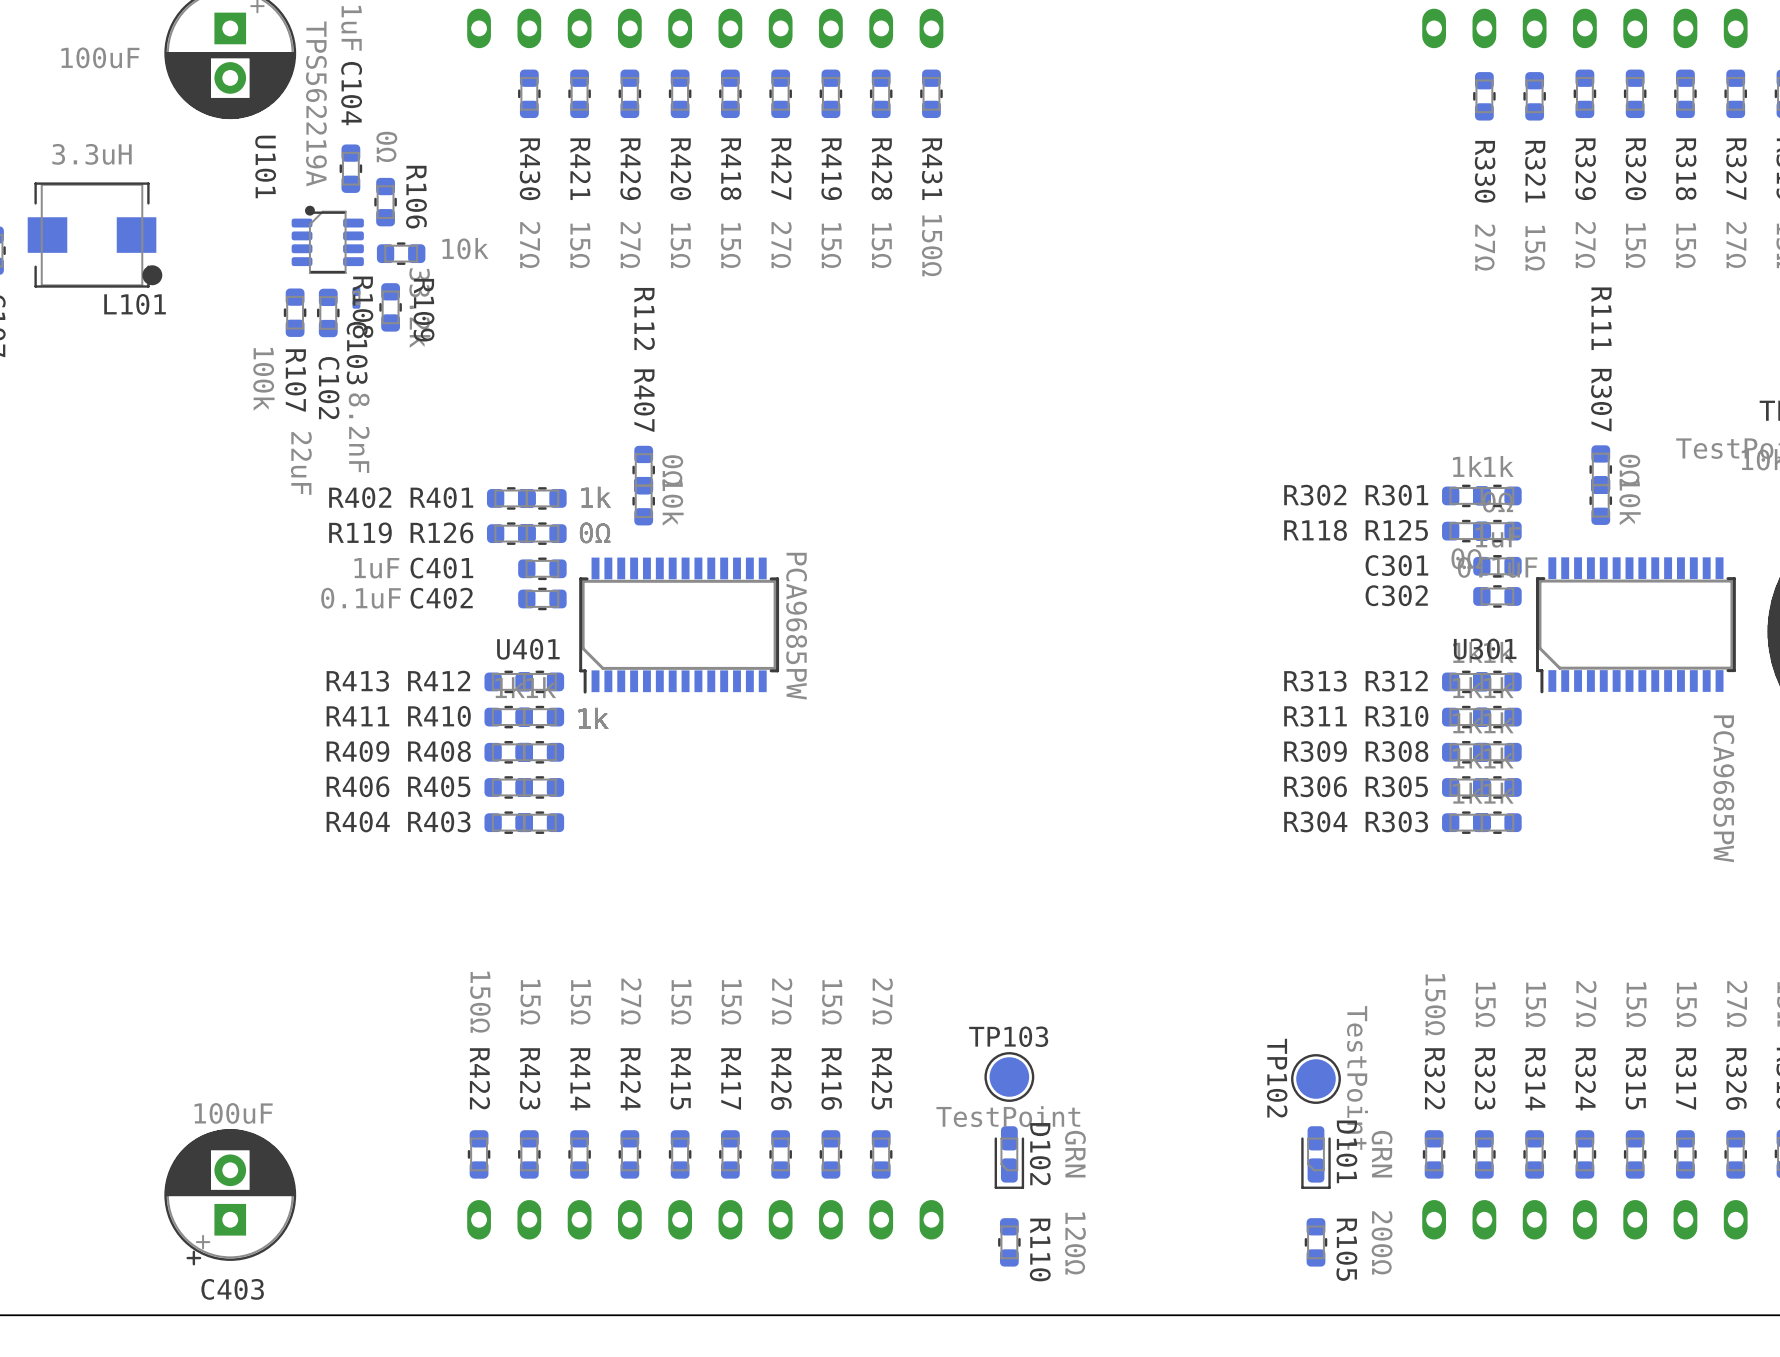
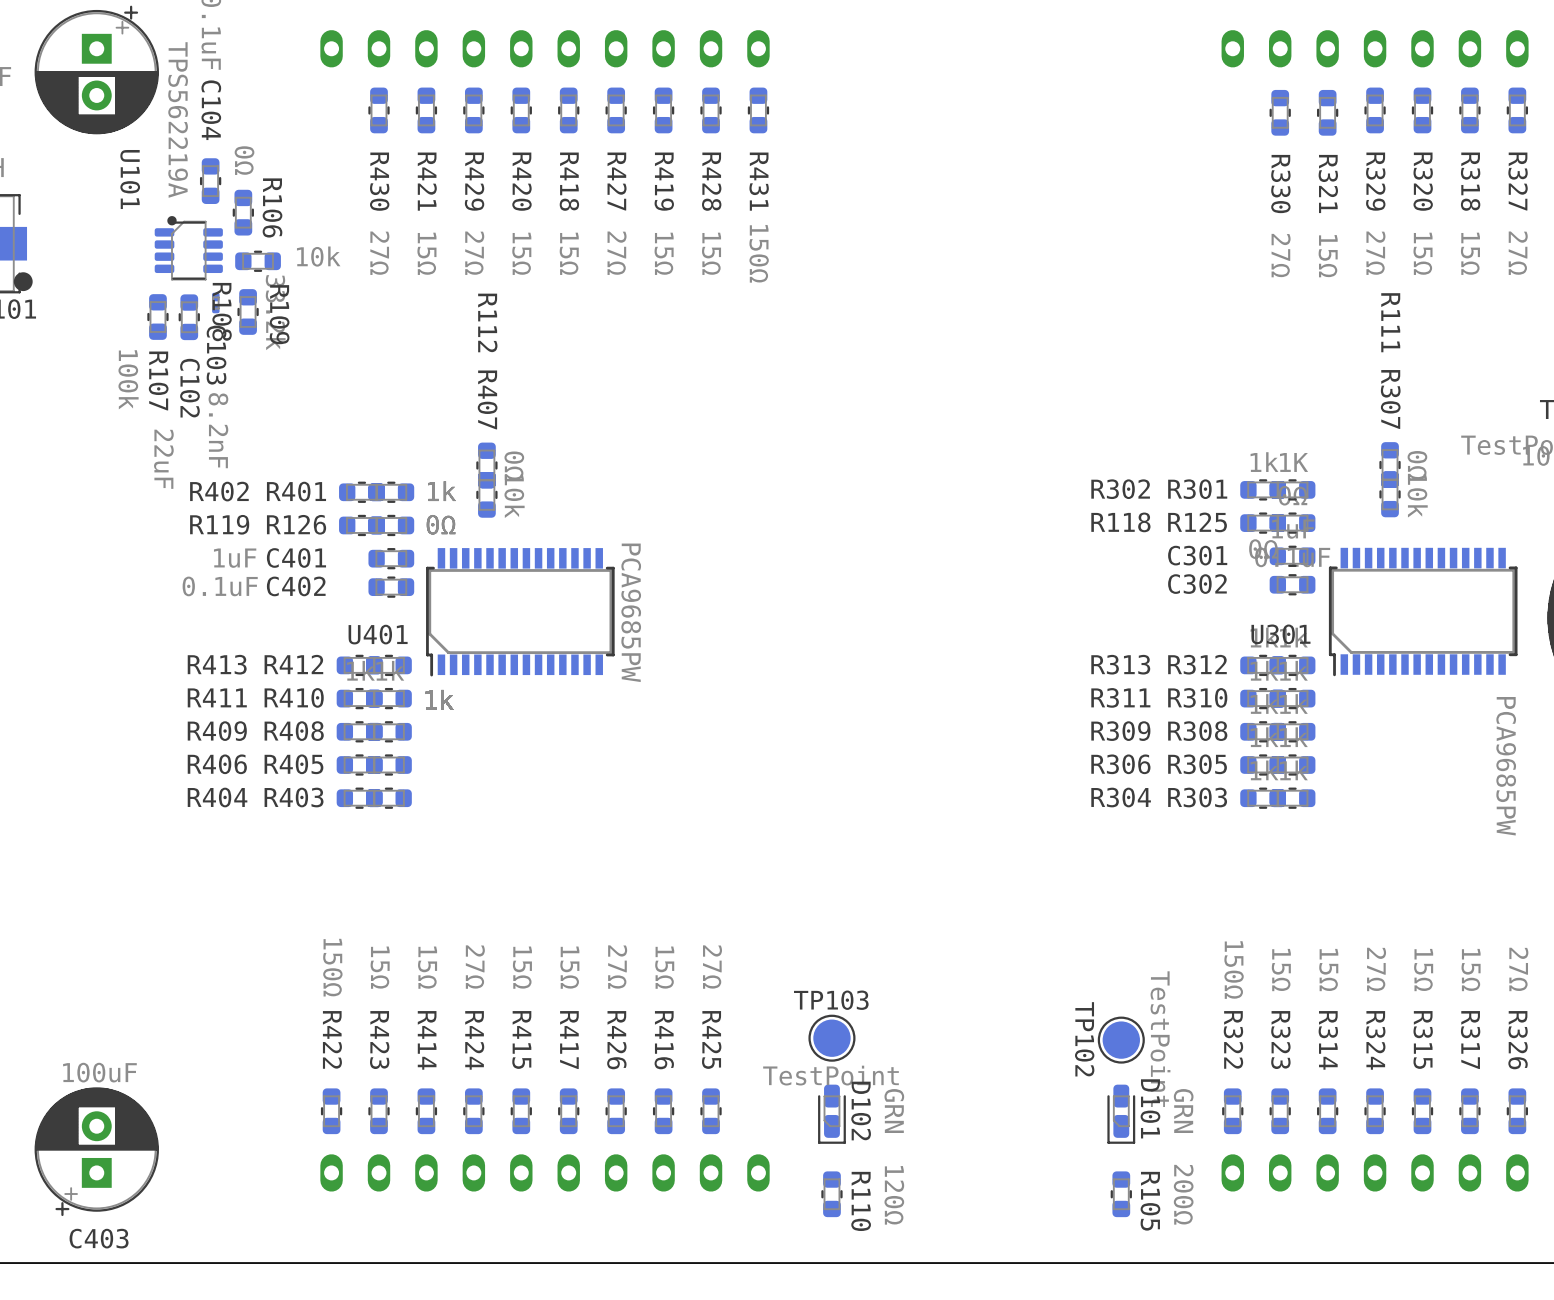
R301 value: 1k (1498, 466) -> 1K (1294, 462)

